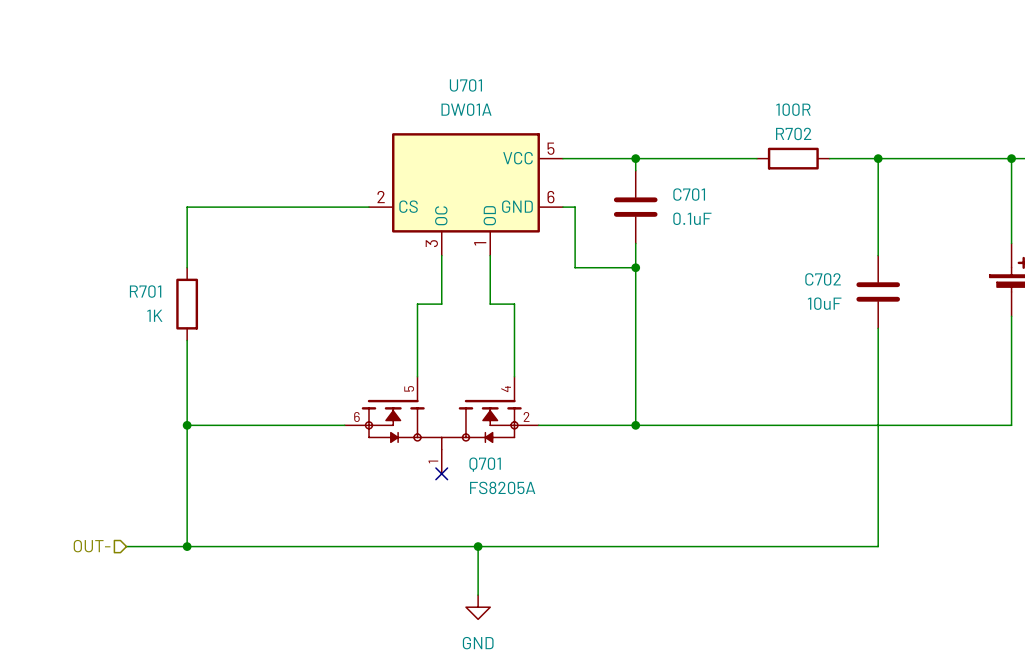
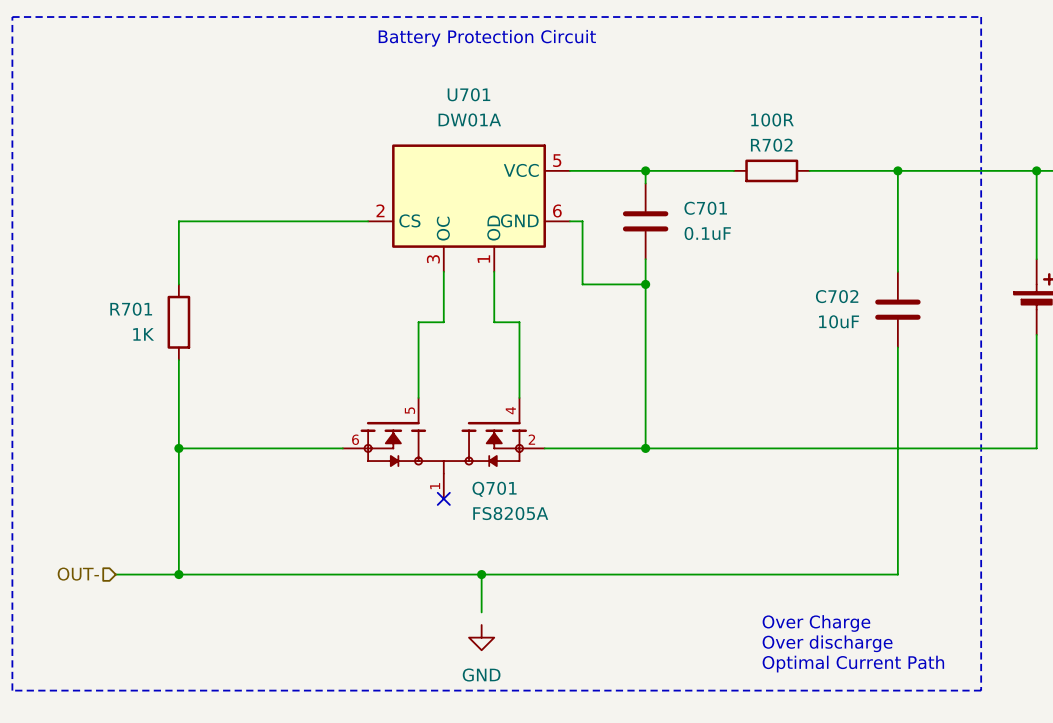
line: none -> (12, 17) (981, 17) (981, 690) (12, 690) (12, 17)
text: none -> Battery Protection Circuit (487, 38)
wire: (720, 158) (756, 158) -> (809, 170) (847, 170)
R702 position: (793, 158) -> (771, 170)
wire: (478, 582) (478, 595) -> none
text: none -> Over Charge (816, 623)
text: none -> Over discharge (827, 643)
text: none -> Optimal Current Path (853, 664)

